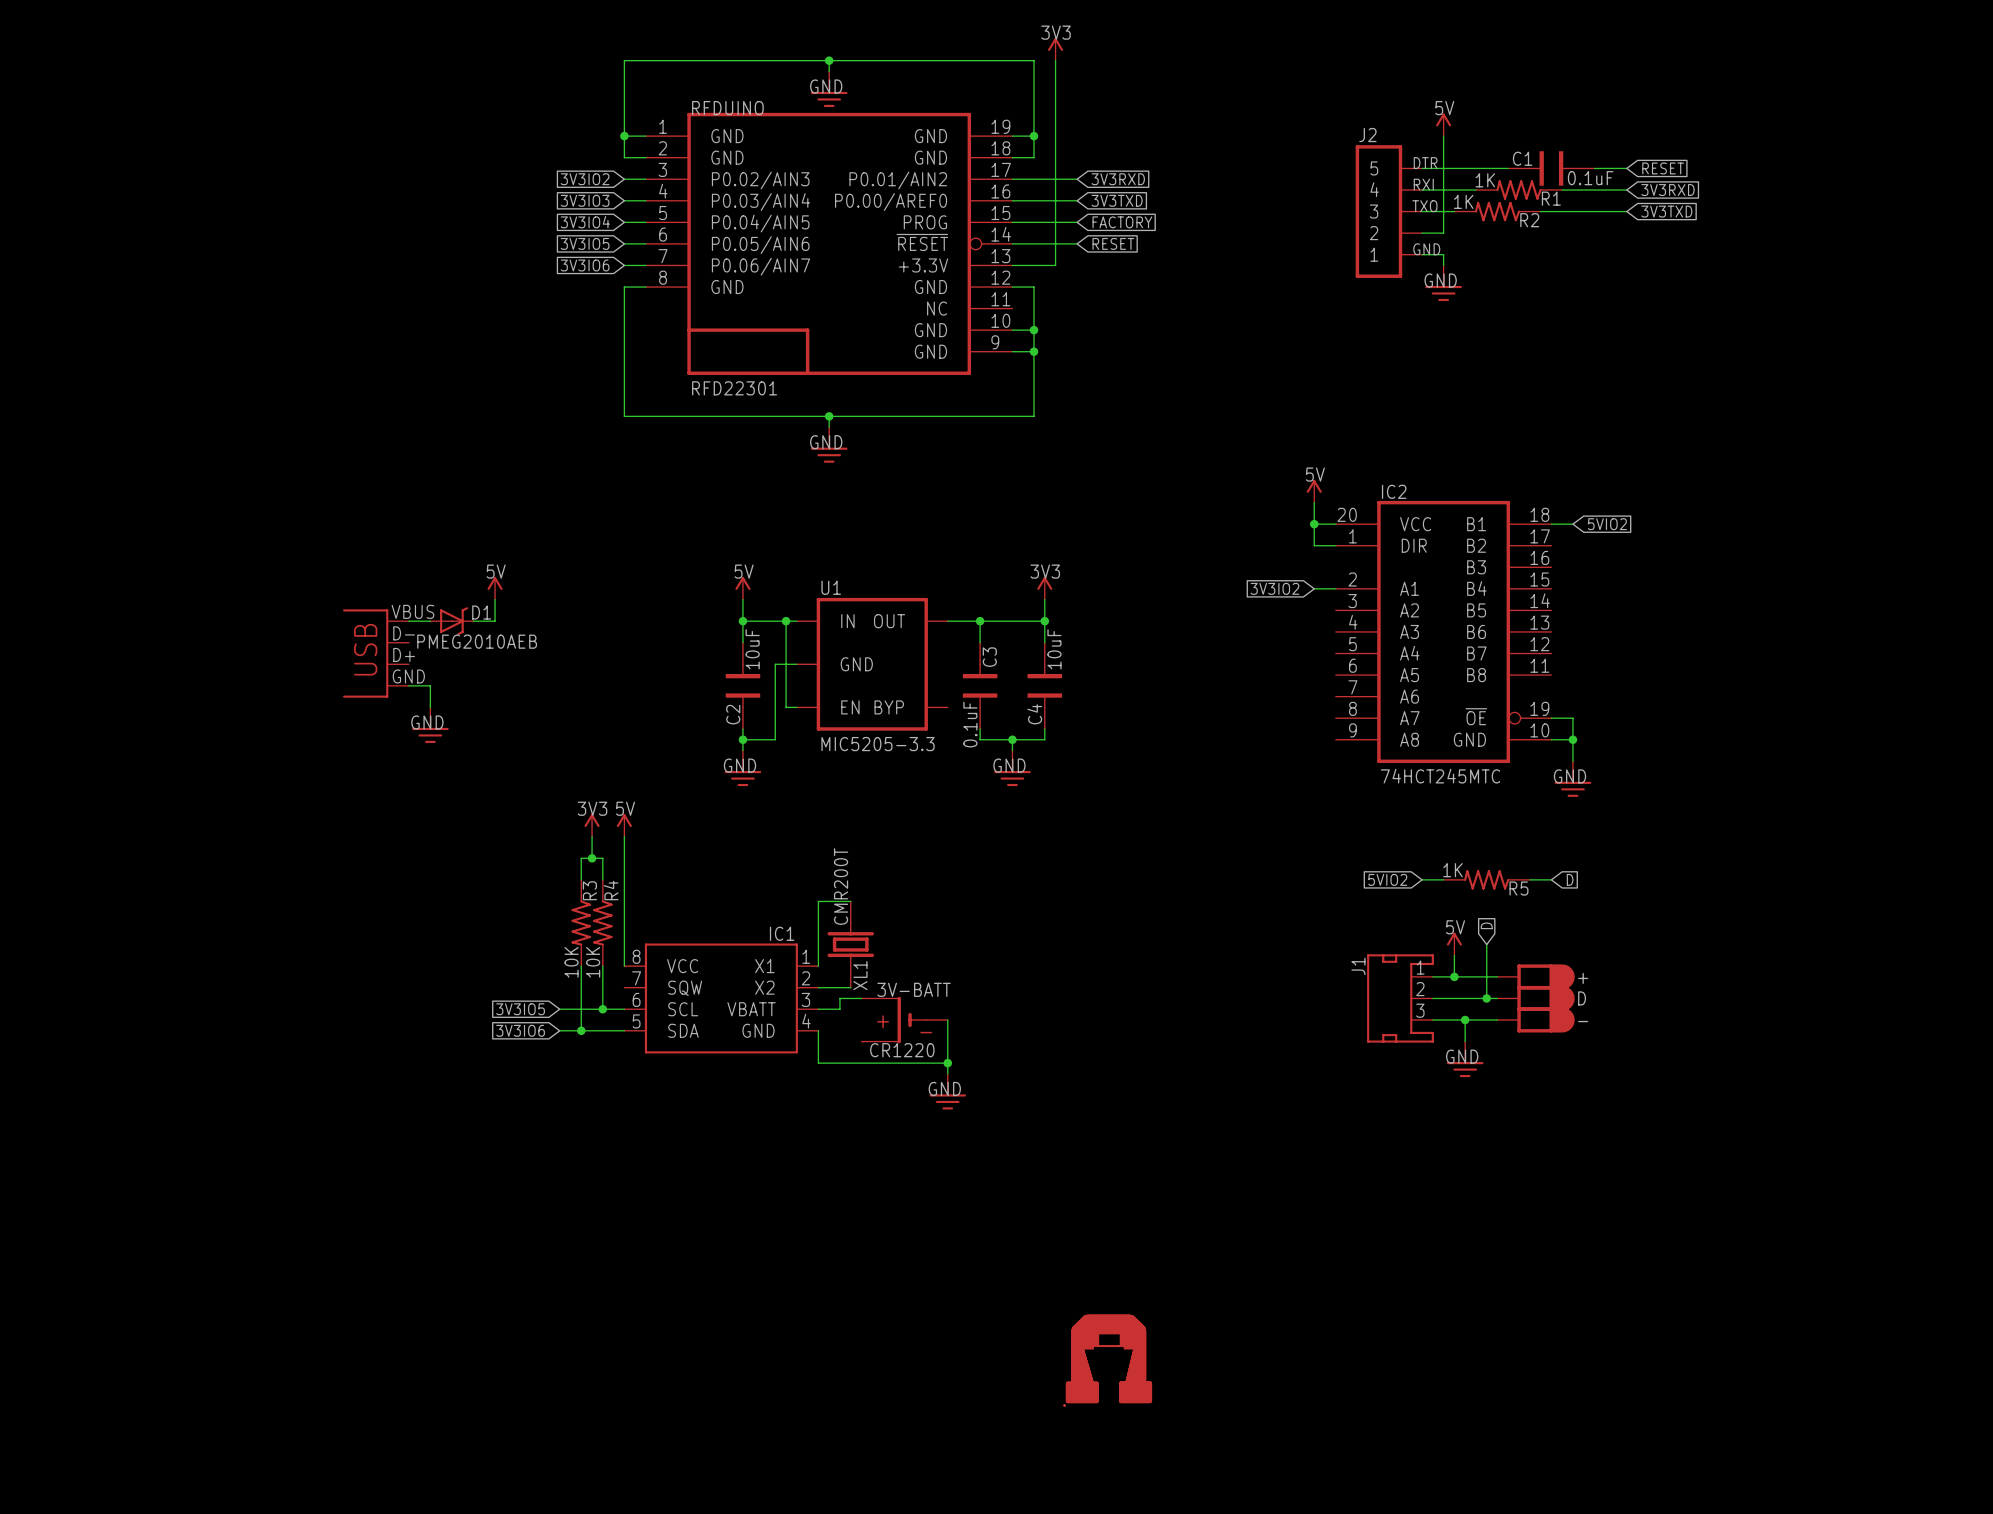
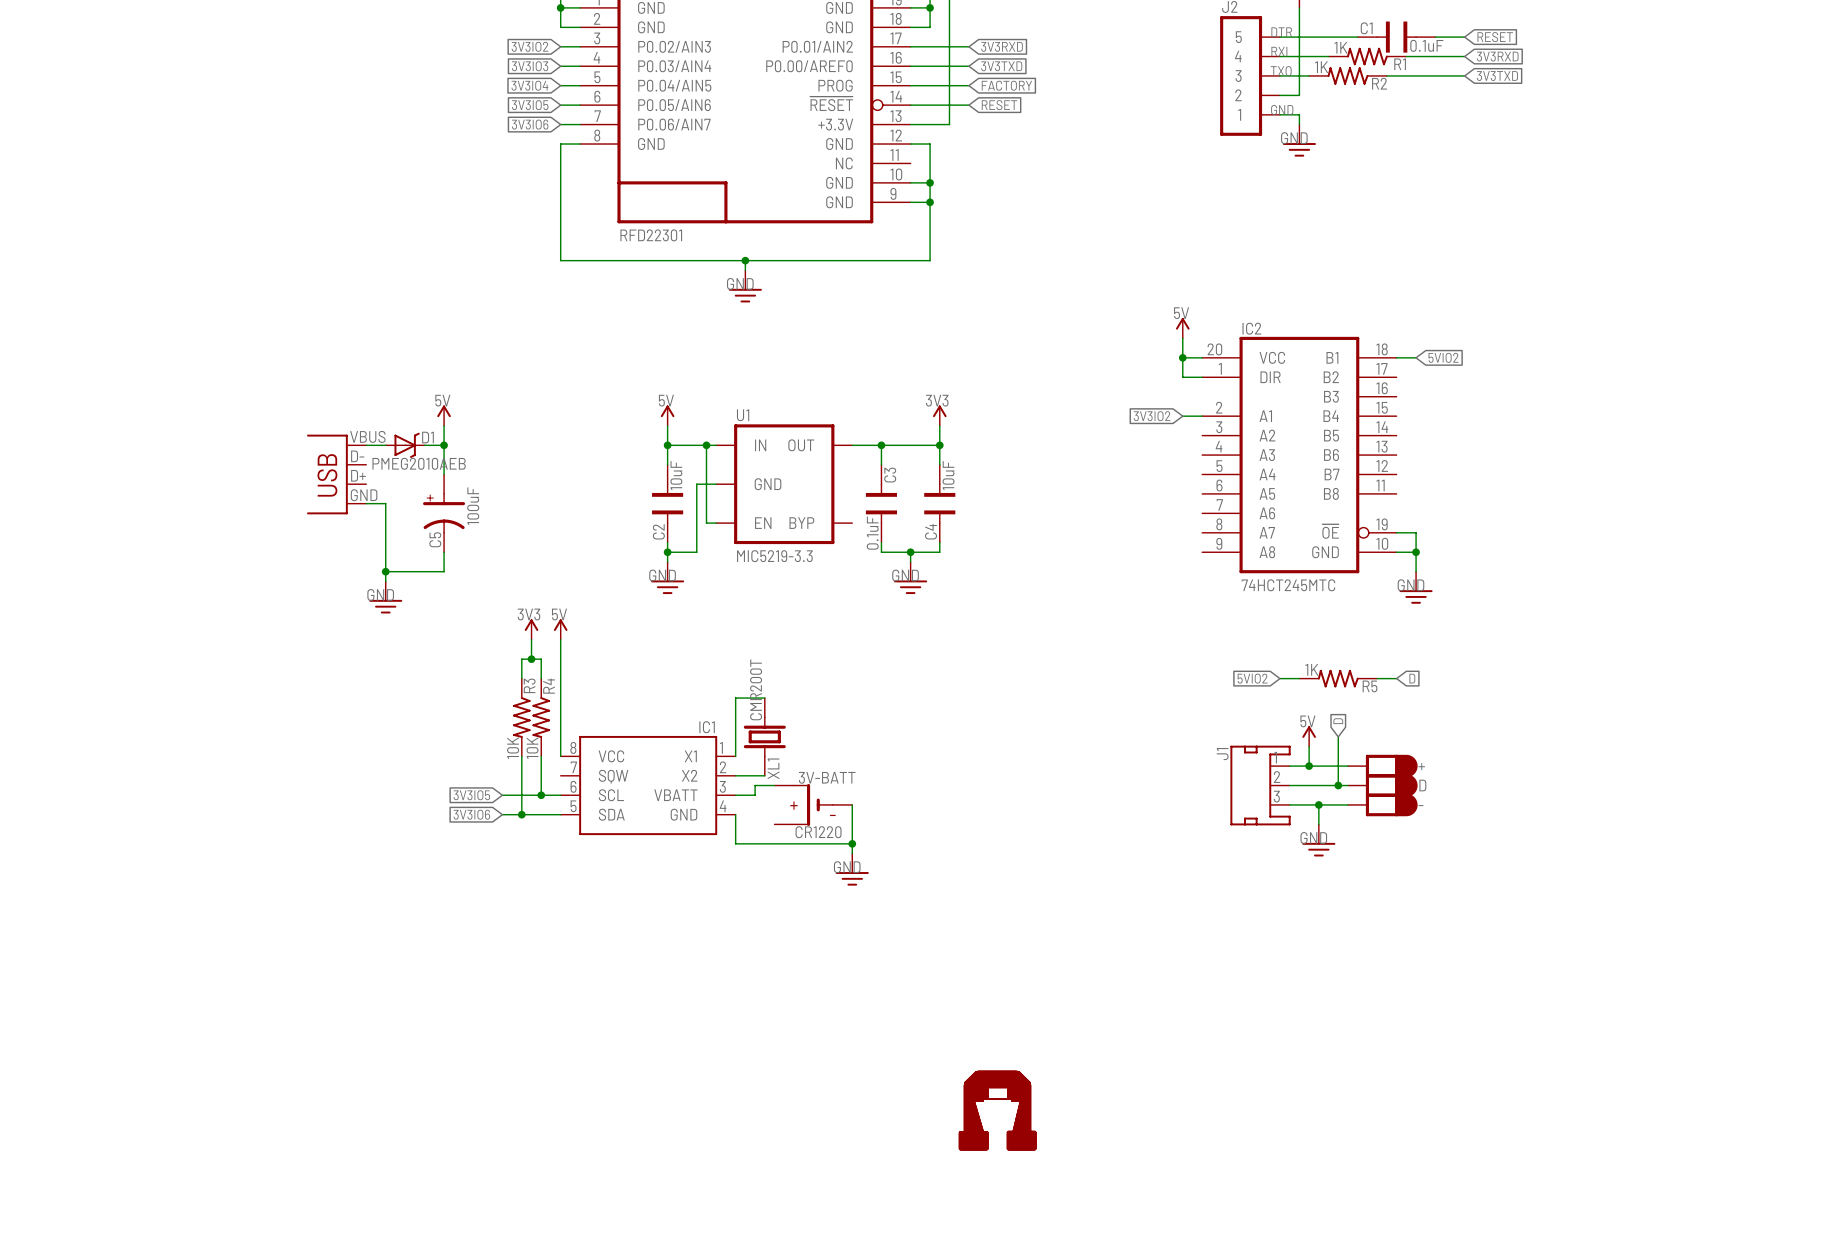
wire: none -> (444, 445) (444, 474)
junction: none -> (444, 445)
C5: none -> 100uF (444, 513)
wire: none -> (385, 523) (385, 581)
power symbol position: GND (430, 725) -> GND (385, 597)
wire: none -> (444, 552) (444, 571) (385, 571)
U1 value: MIC5205-3.3 (878, 744) -> MIC5219-3.3 (774, 556)
junction: none -> (385, 571)

